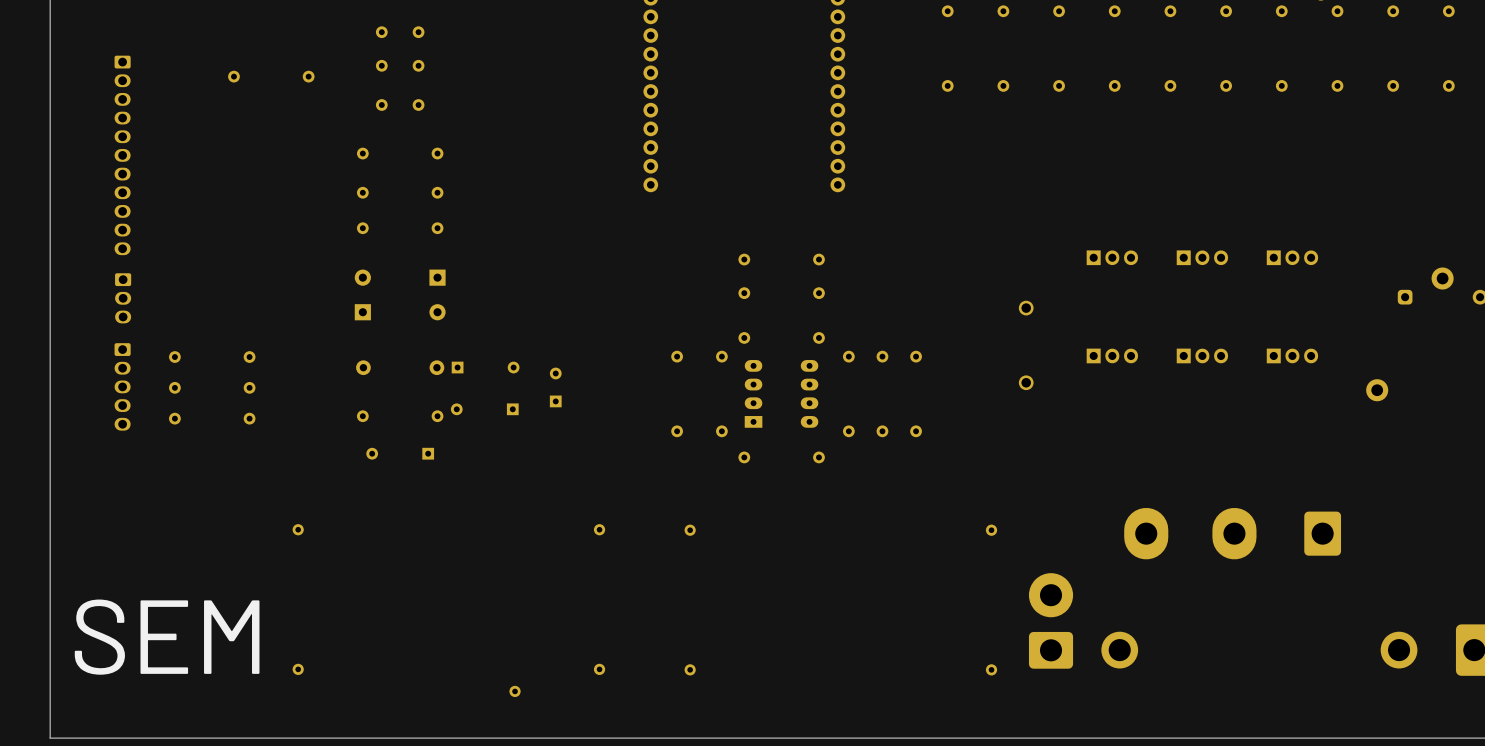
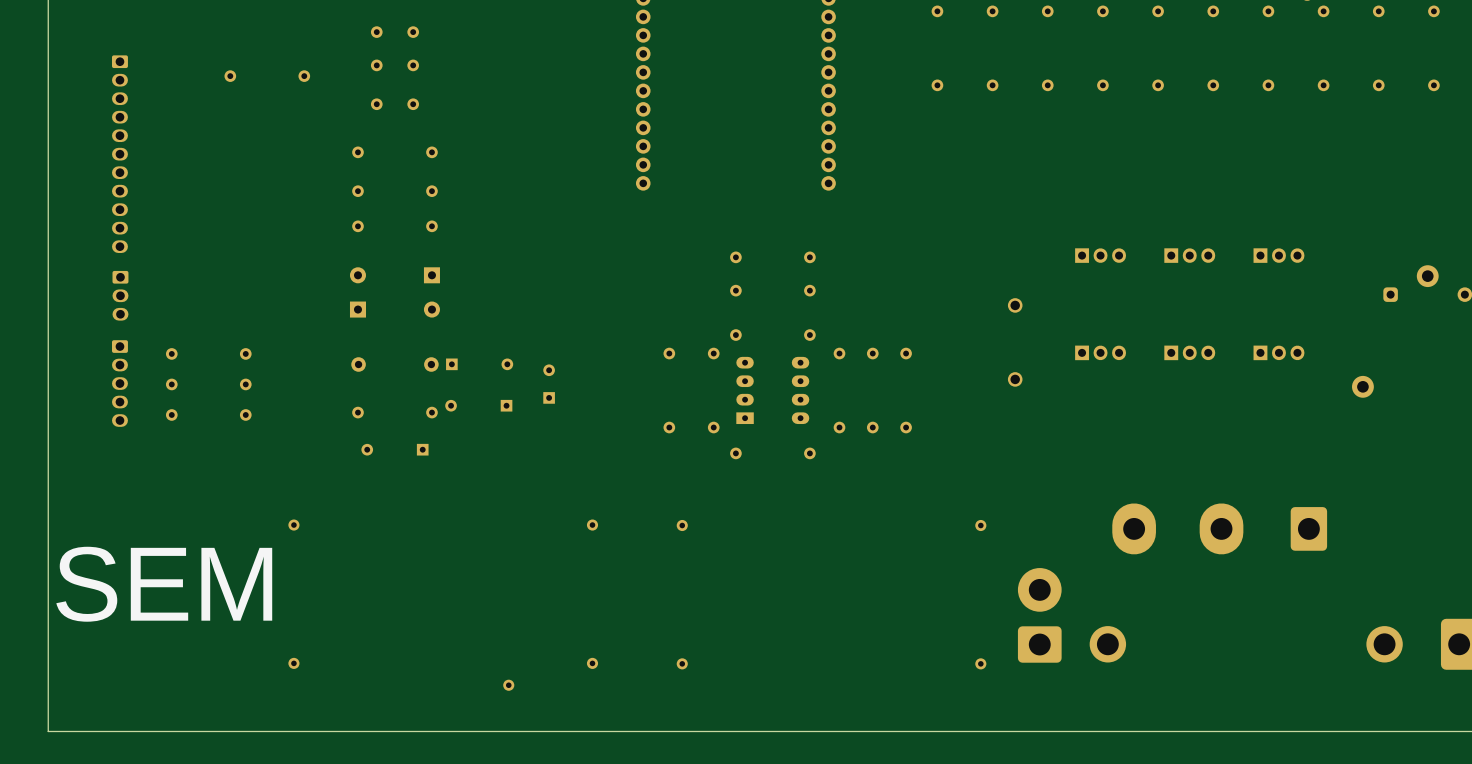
text position: SEM (167, 637) -> SEM (164, 584)

